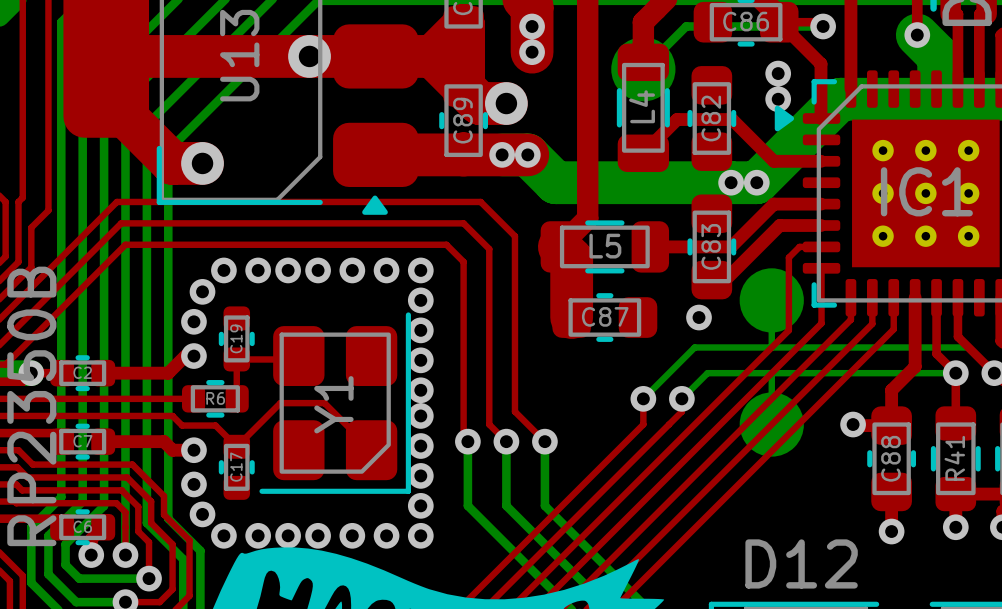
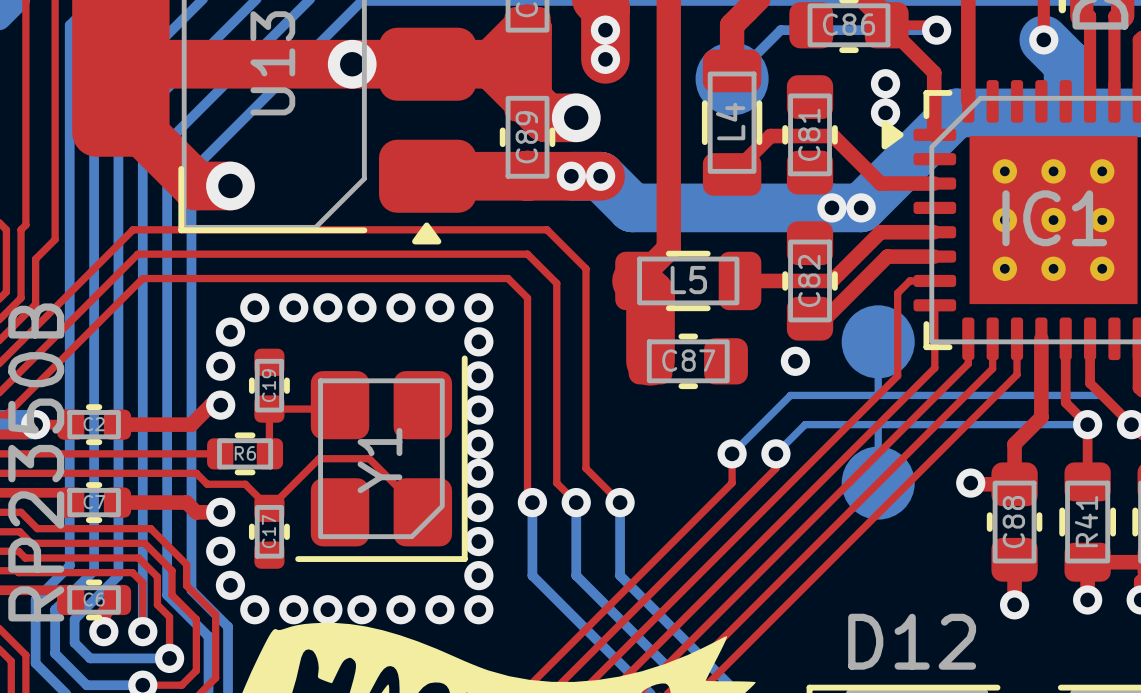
C82 name: C82 (711, 118) -> C81 (809, 134)
C83 name: C83 (711, 246) -> C82 (809, 280)

